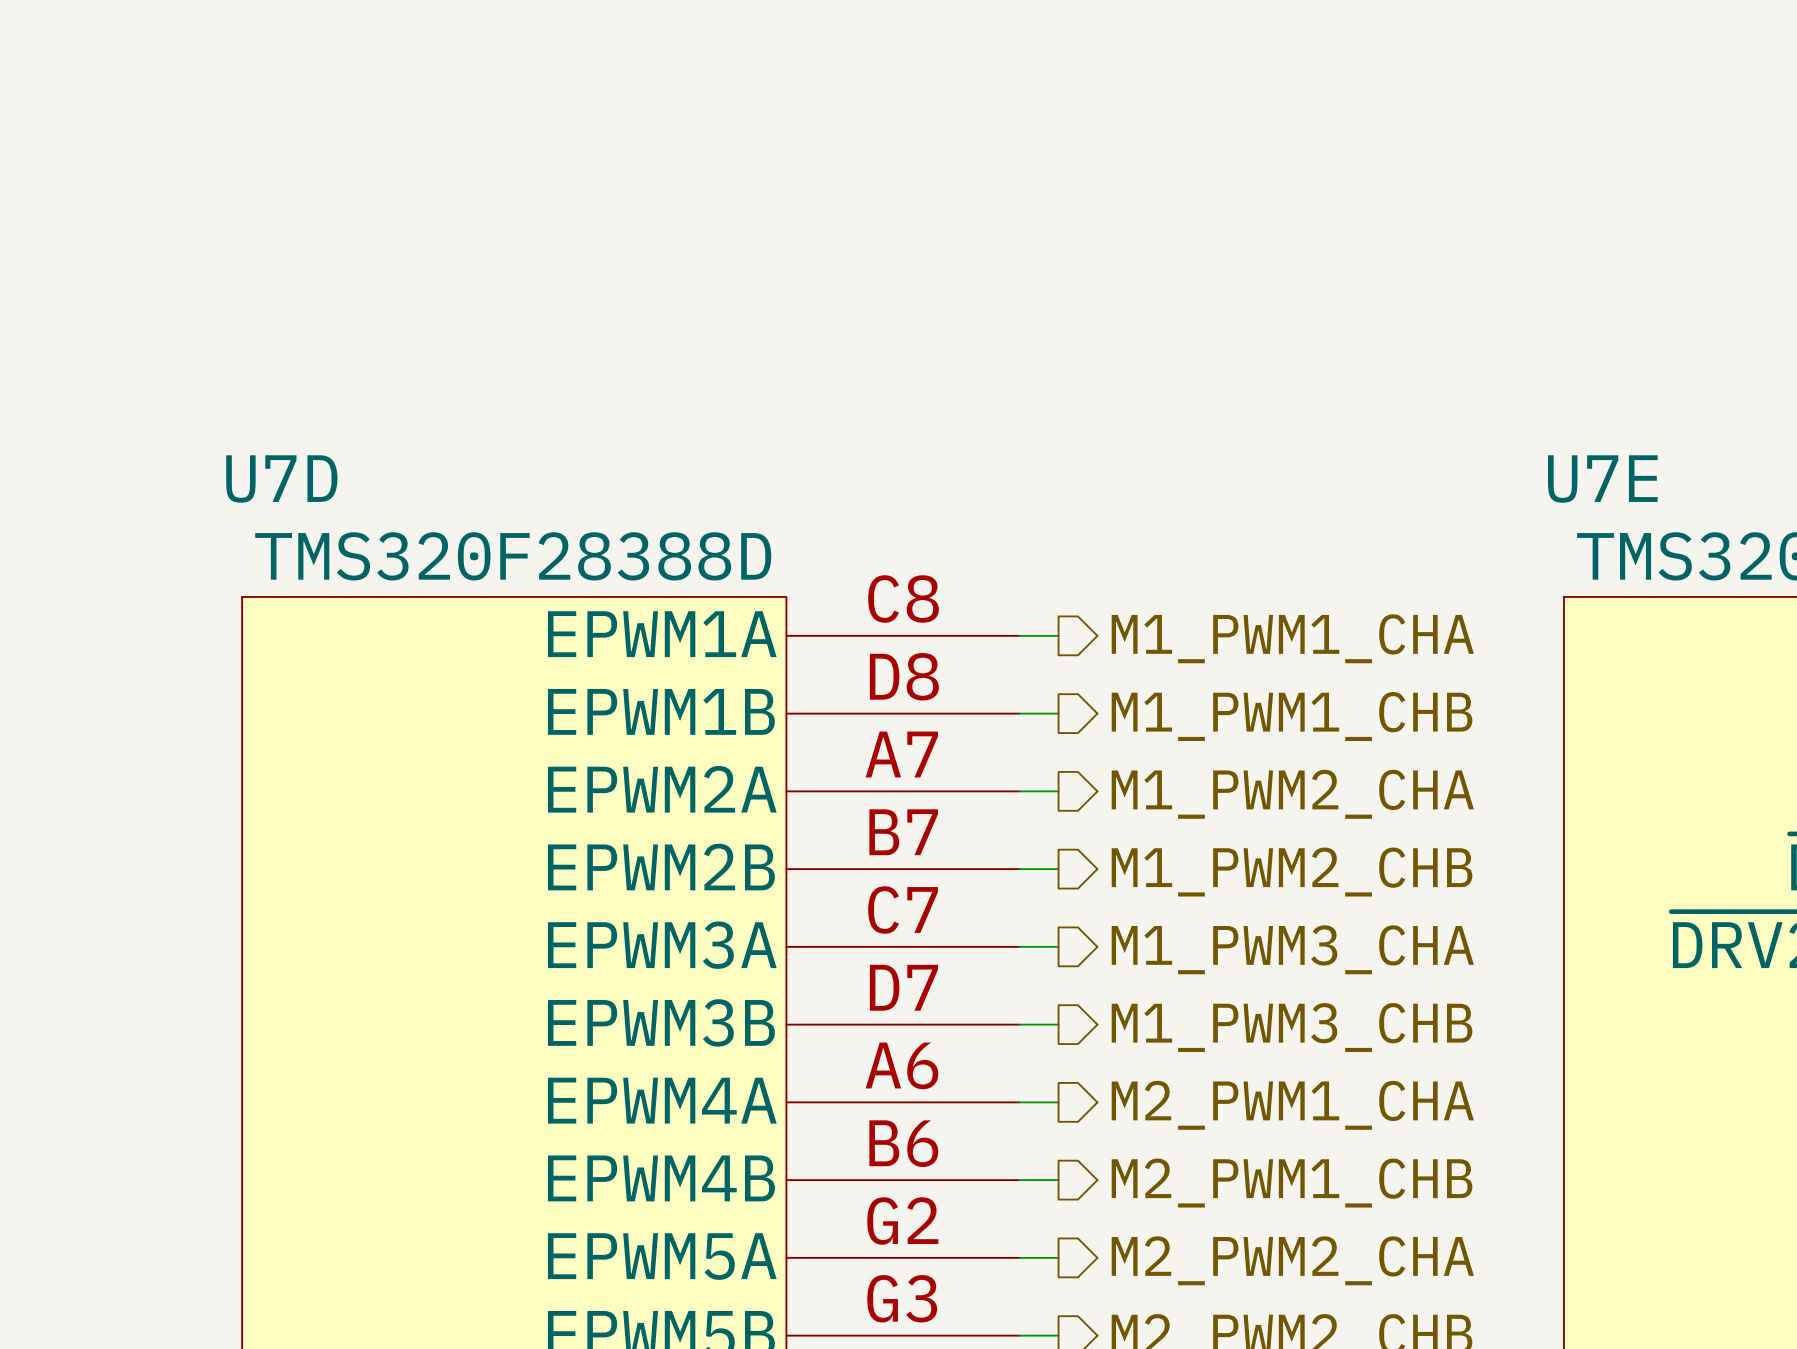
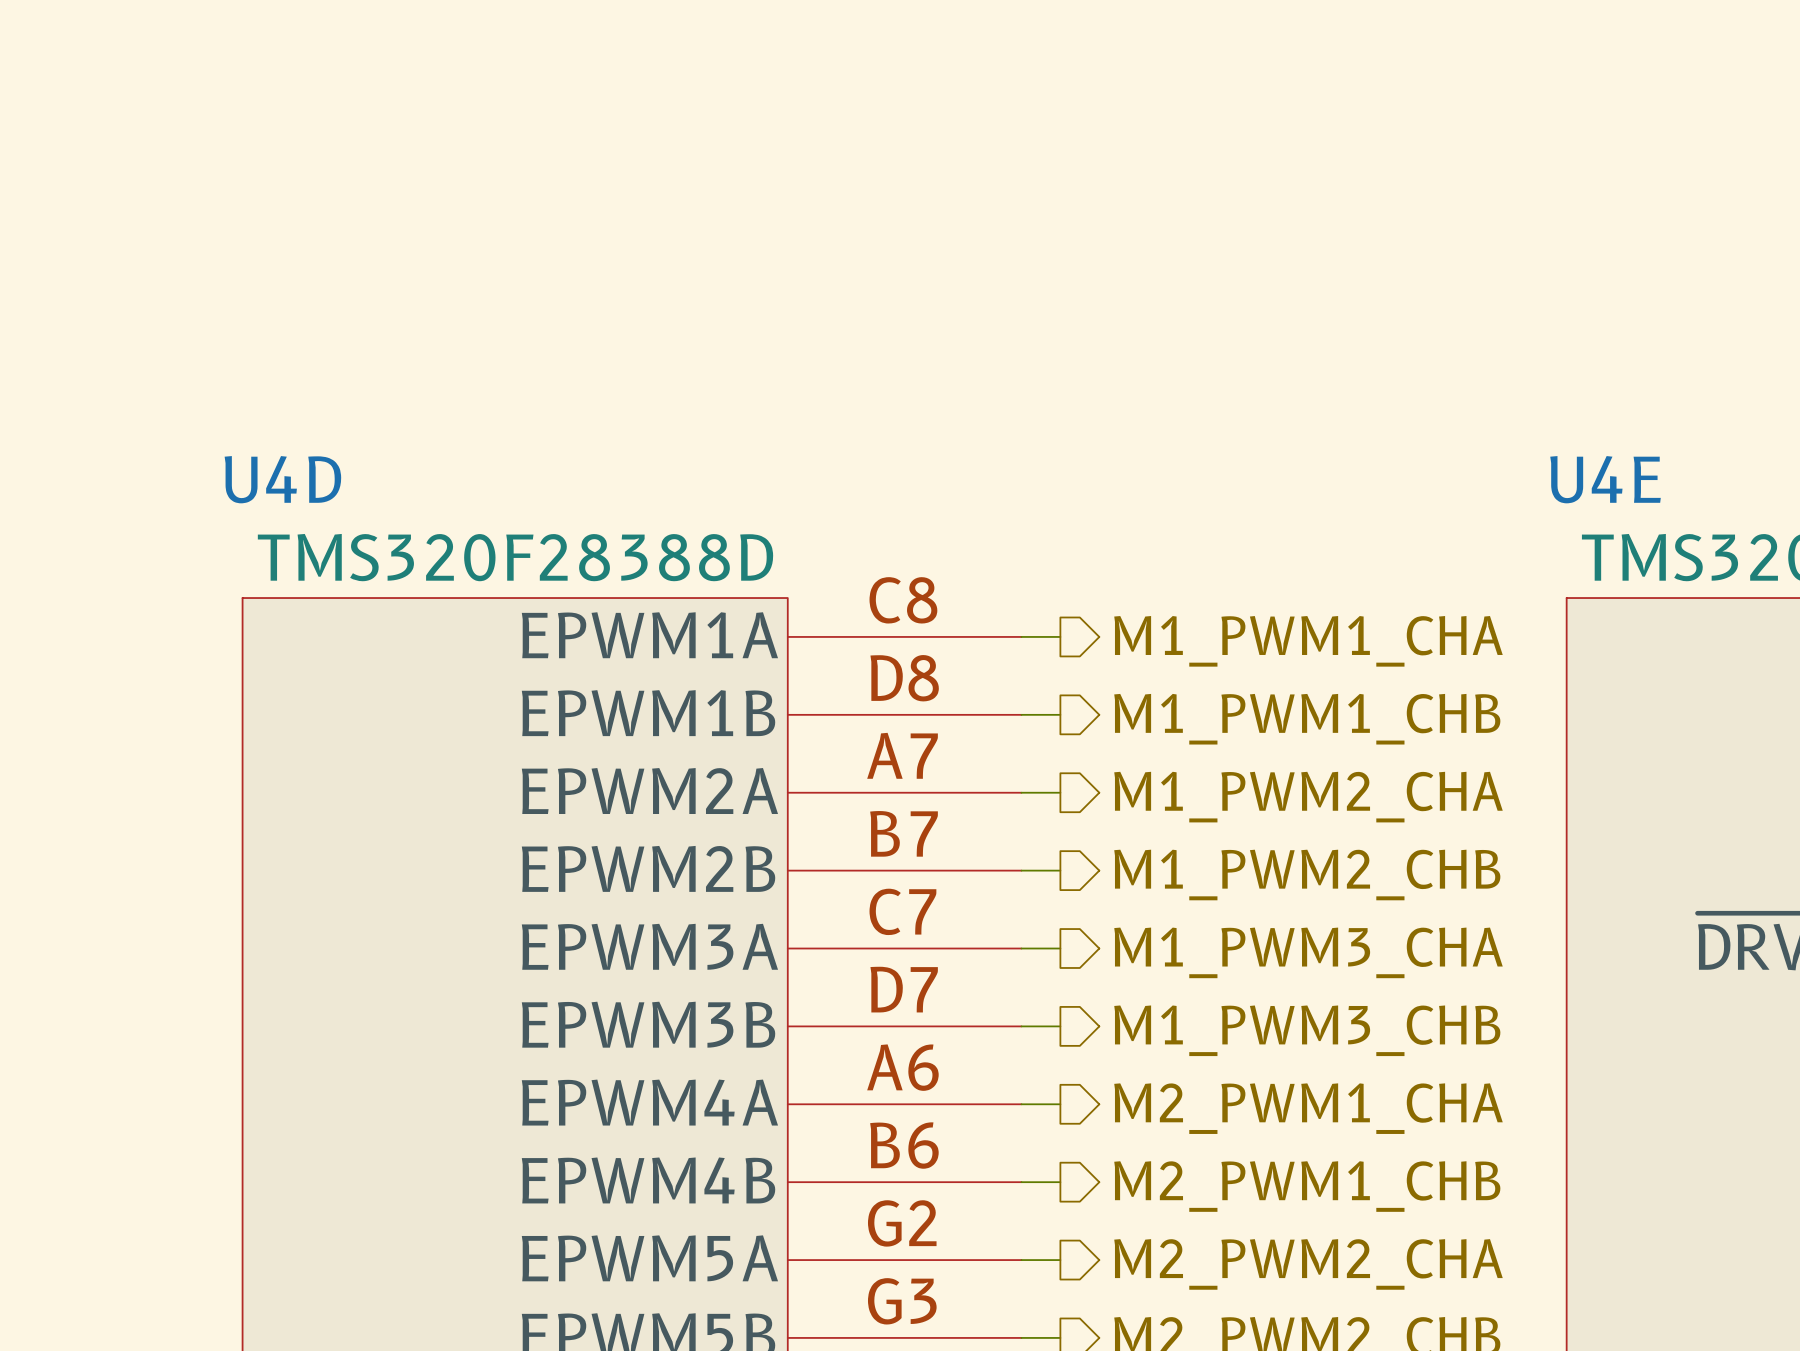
U7D name: U7D (281, 479) -> U4D (282, 479)
U7E name: U7E (1602, 479) -> U4E (1605, 479)

